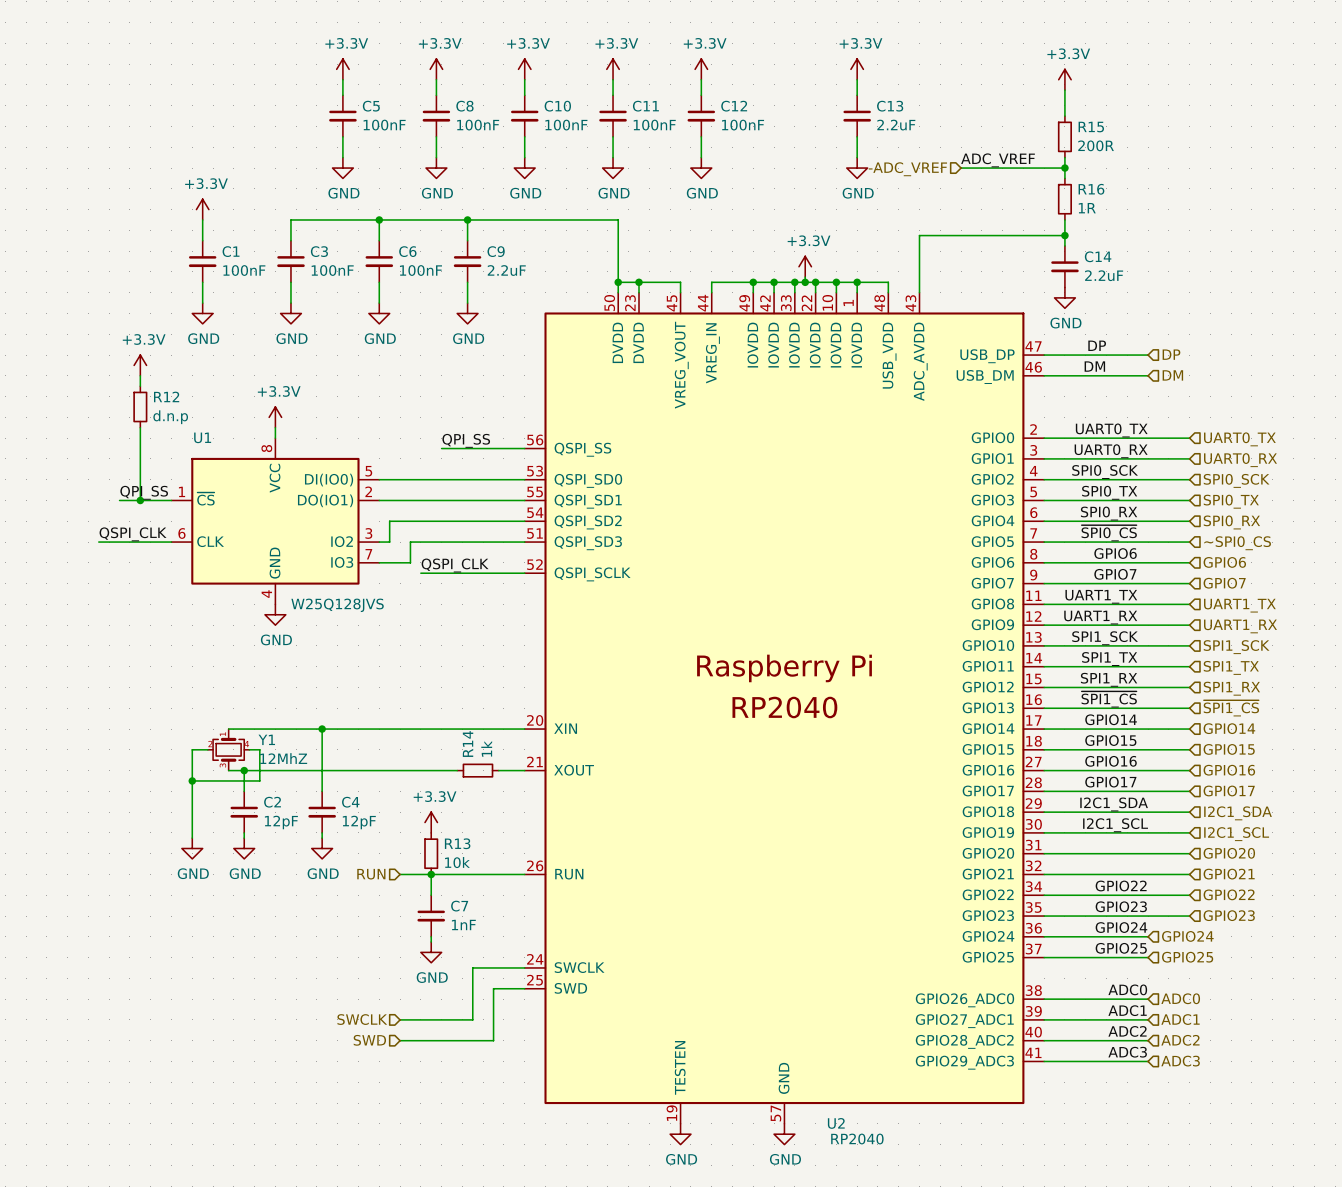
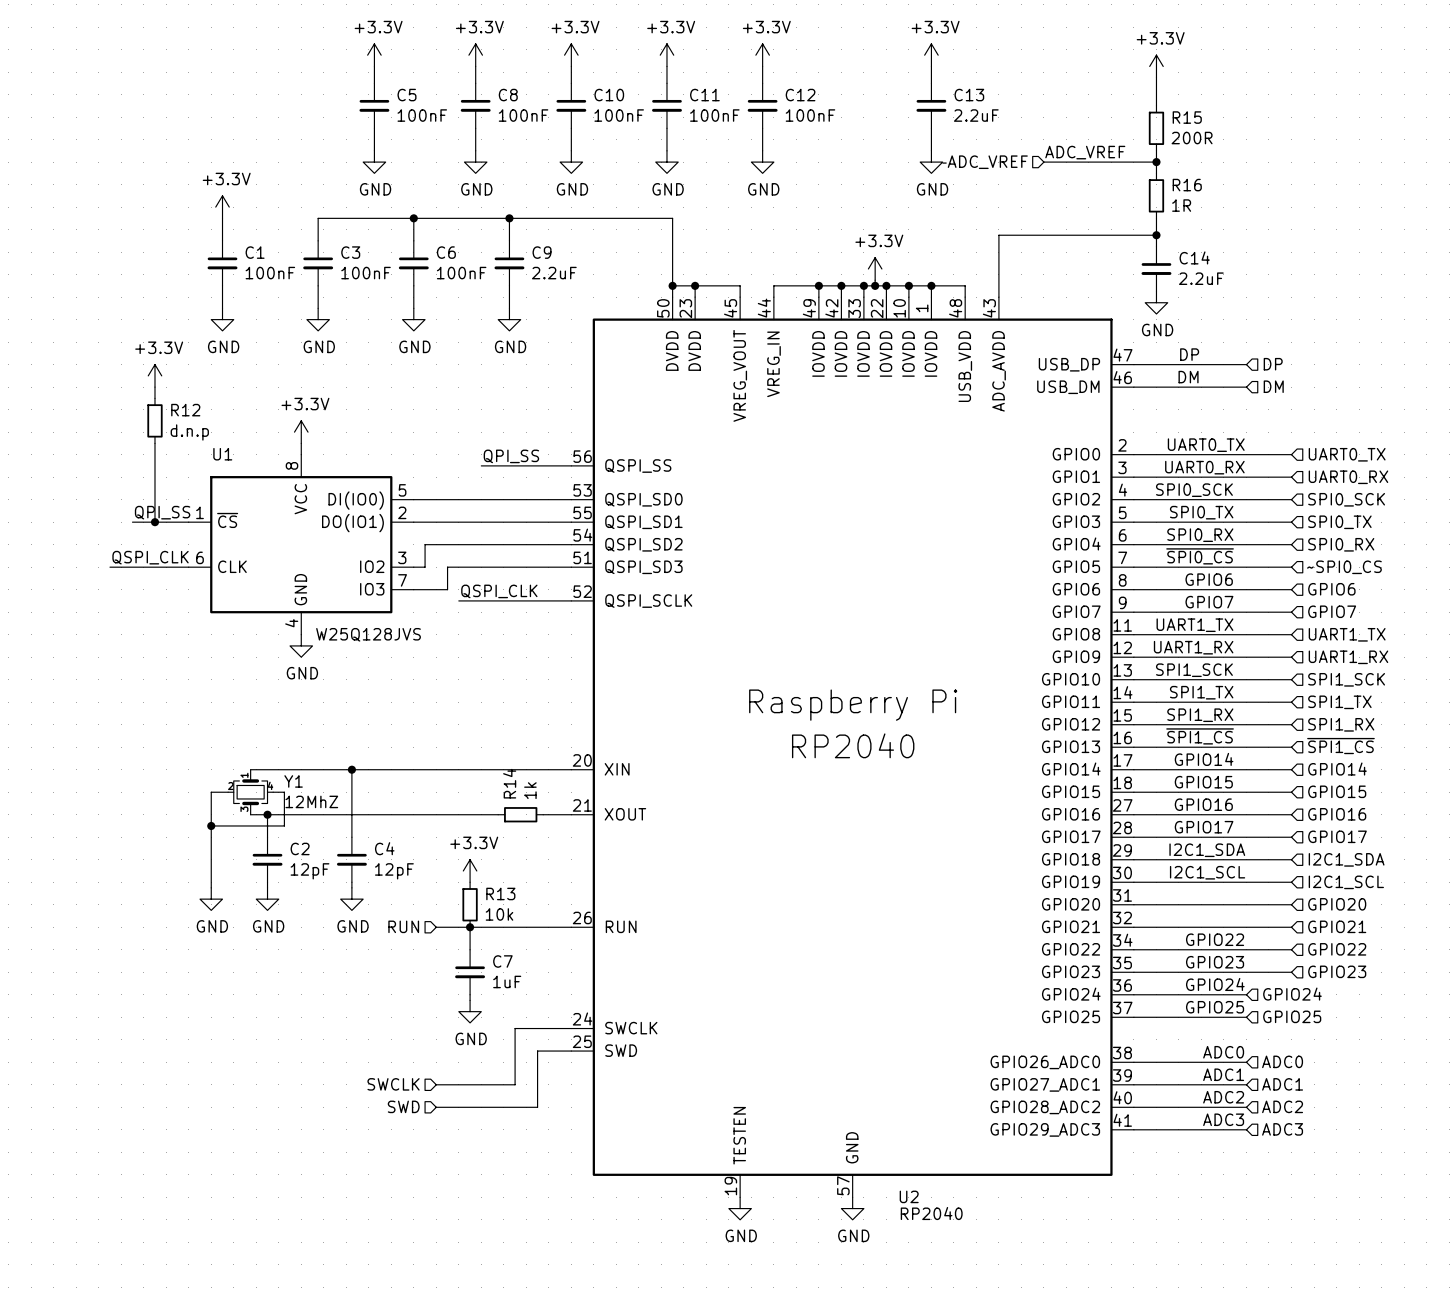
C7 value: 1nF (463, 924) -> 1uF (507, 981)

